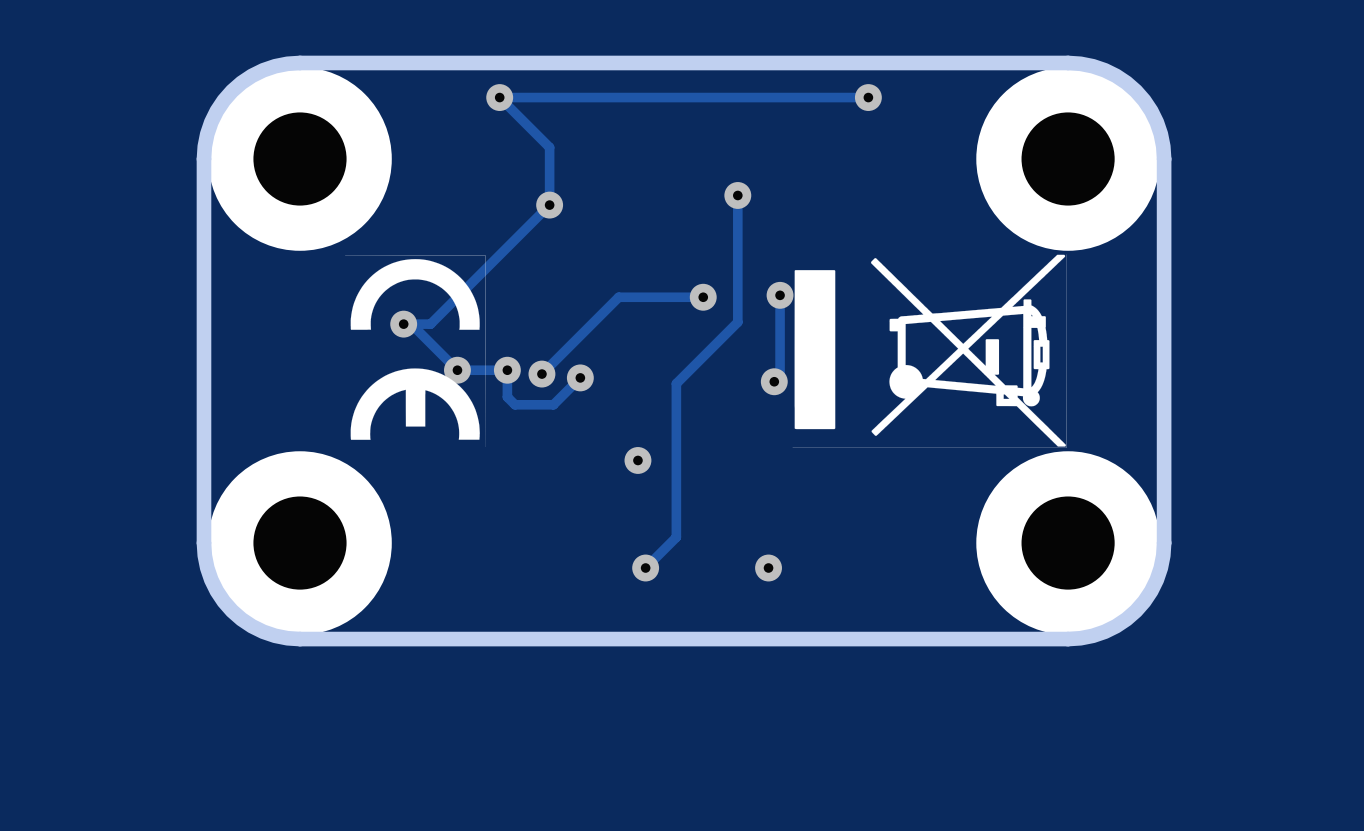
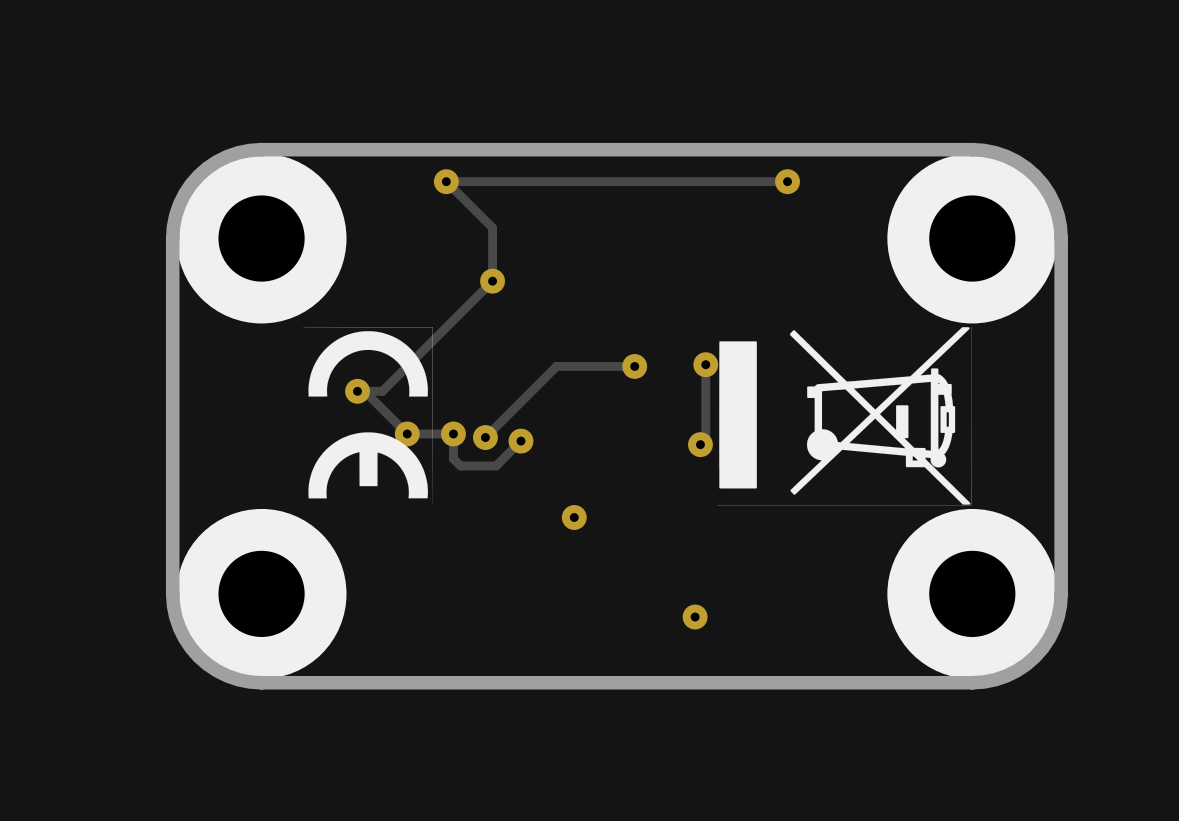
track: (737, 195) (737, 322) (676, 383) (676, 537) (645, 568) -> none
via: (737, 195) -> none
via: (645, 568) -> none

